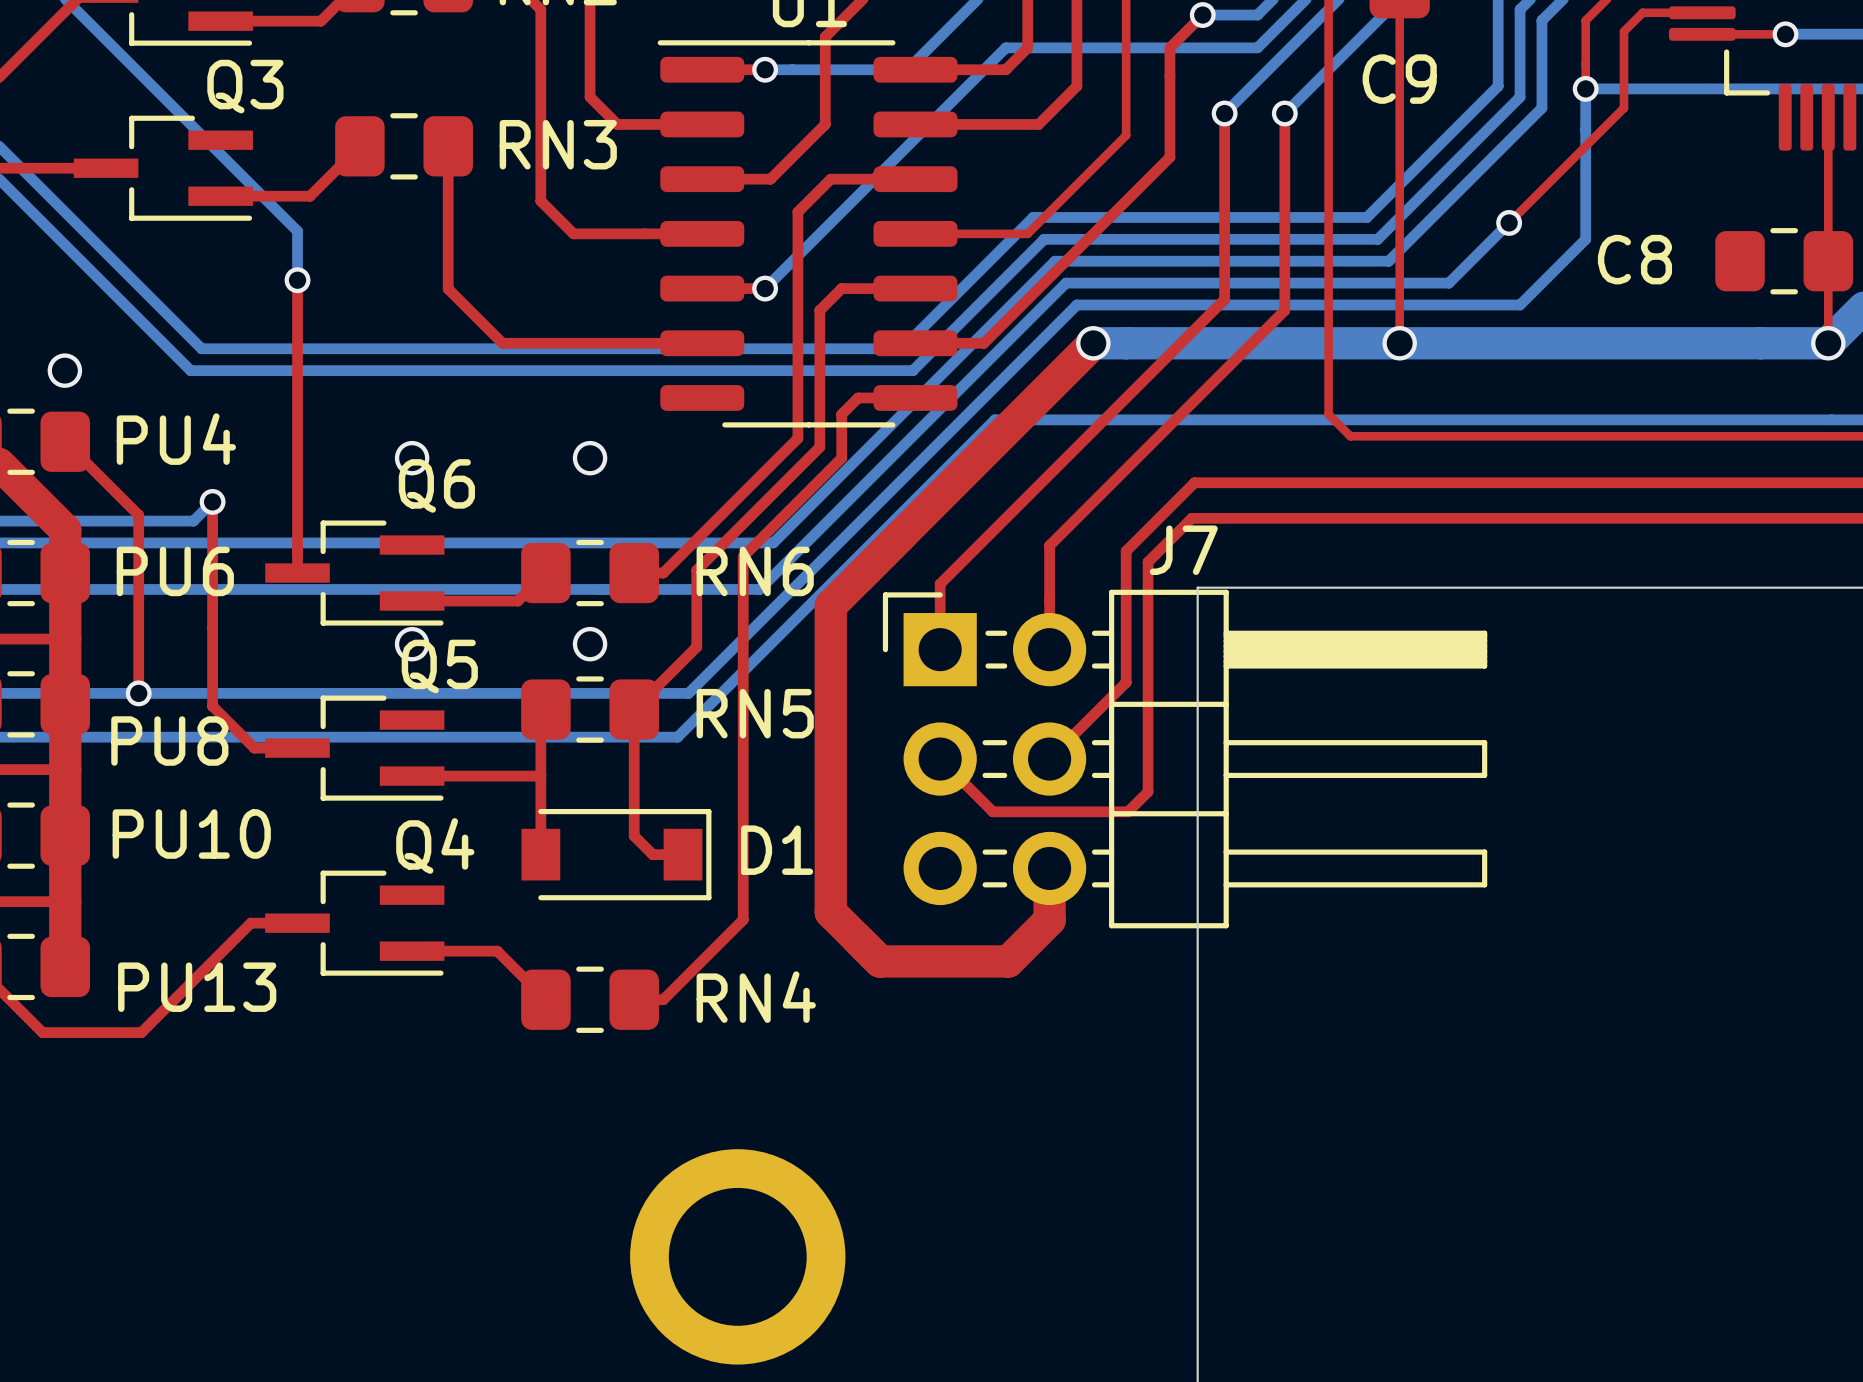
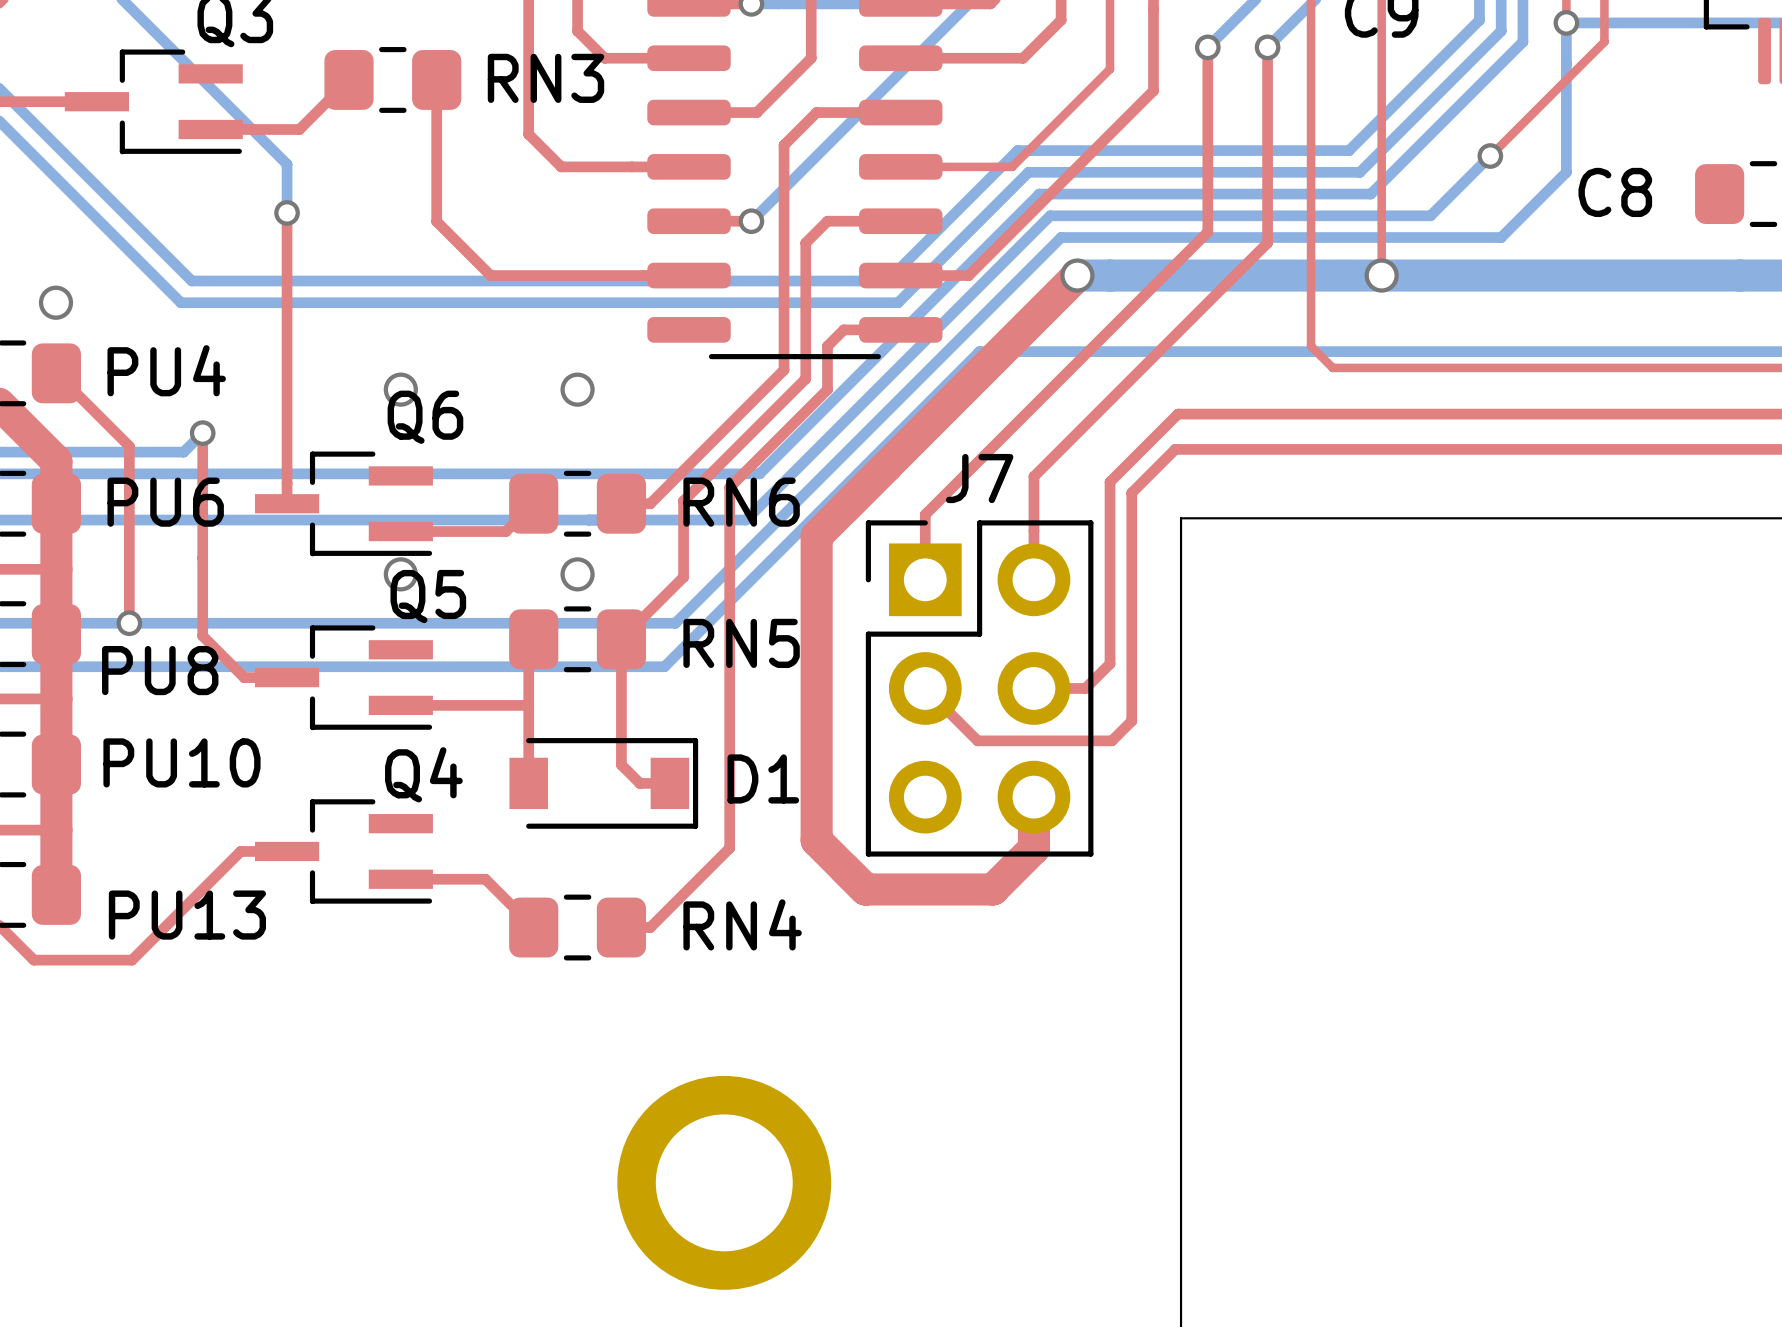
J7 footprint: [882, 589, 1488, 929] -> [865, 520, 1094, 857]
top track: (1126, 682) (1049, 759) -> (1110, 612) (1110, 663) (1085, 688) (1033, 688)

